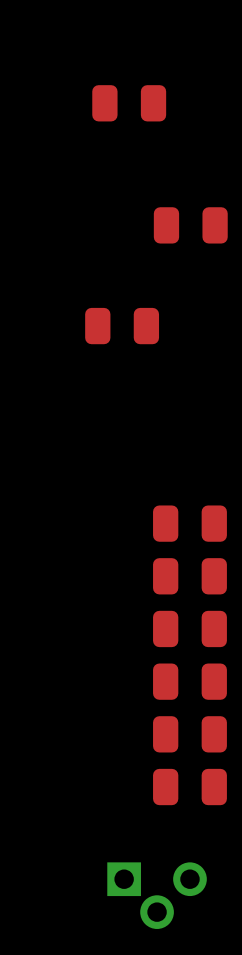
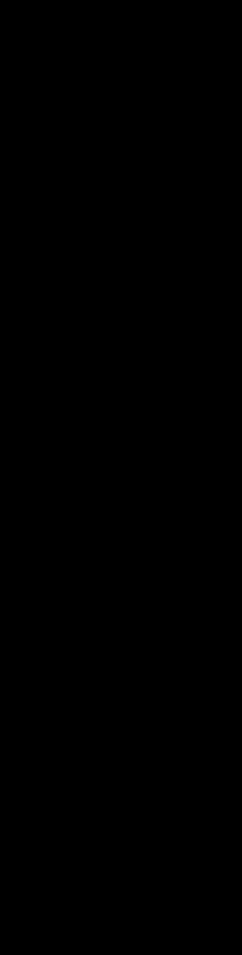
part: (129, 103) -> none
part: (190, 225) -> none
part: (122, 326) -> none
part: (189, 523) -> none
part: (189, 576) -> none
part: (189, 628) -> none
part: (189, 681) -> none
part: (189, 734) -> none
part: (189, 787) -> none
part: (157, 895) -> none

